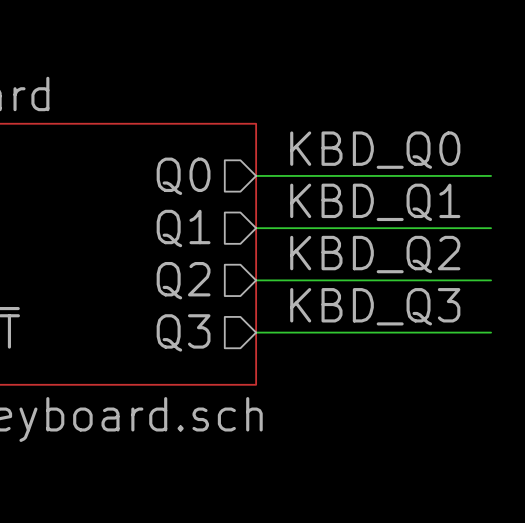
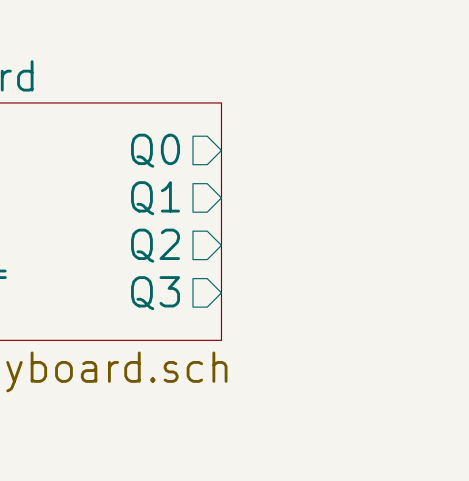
label: KBD_Q0 (375, 150) -> none
wire: (256, 175) (491, 175) -> none
label: KBD_Q1 (375, 202) -> none
wire: (256, 228) (491, 228) -> none
label: KBD_Q2 (375, 254) -> none
wire: (256, 280) (491, 280) -> none
label: KBD_Q3 (375, 306) -> none
wire: (256, 332) (491, 332) -> none

